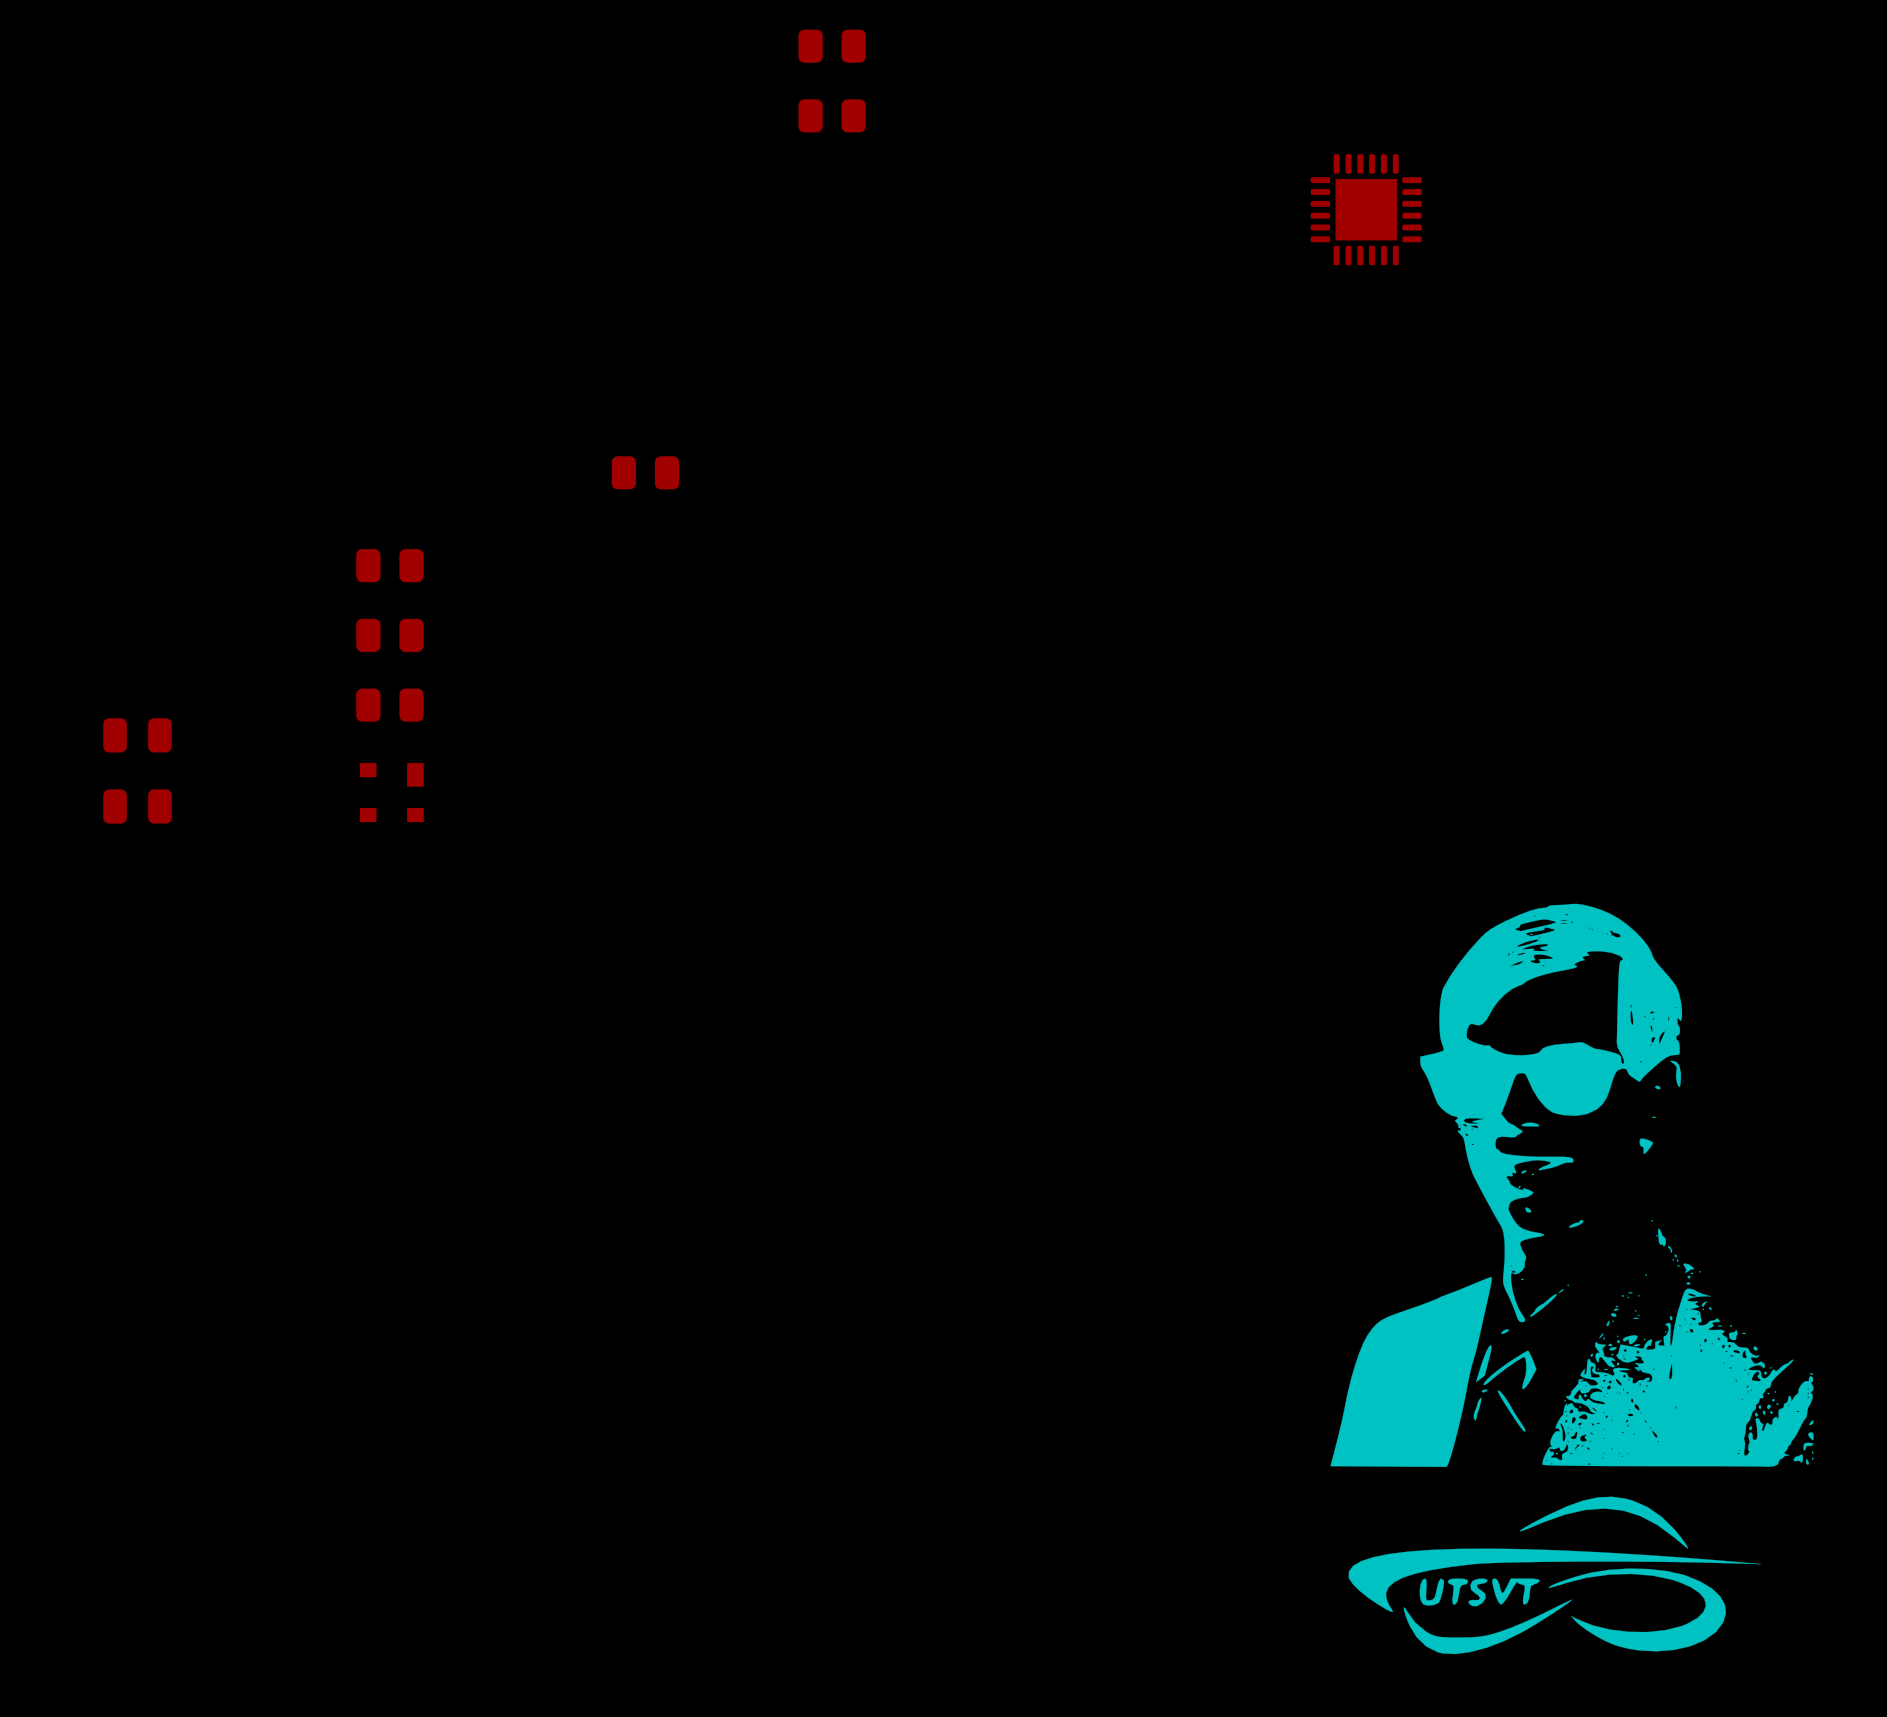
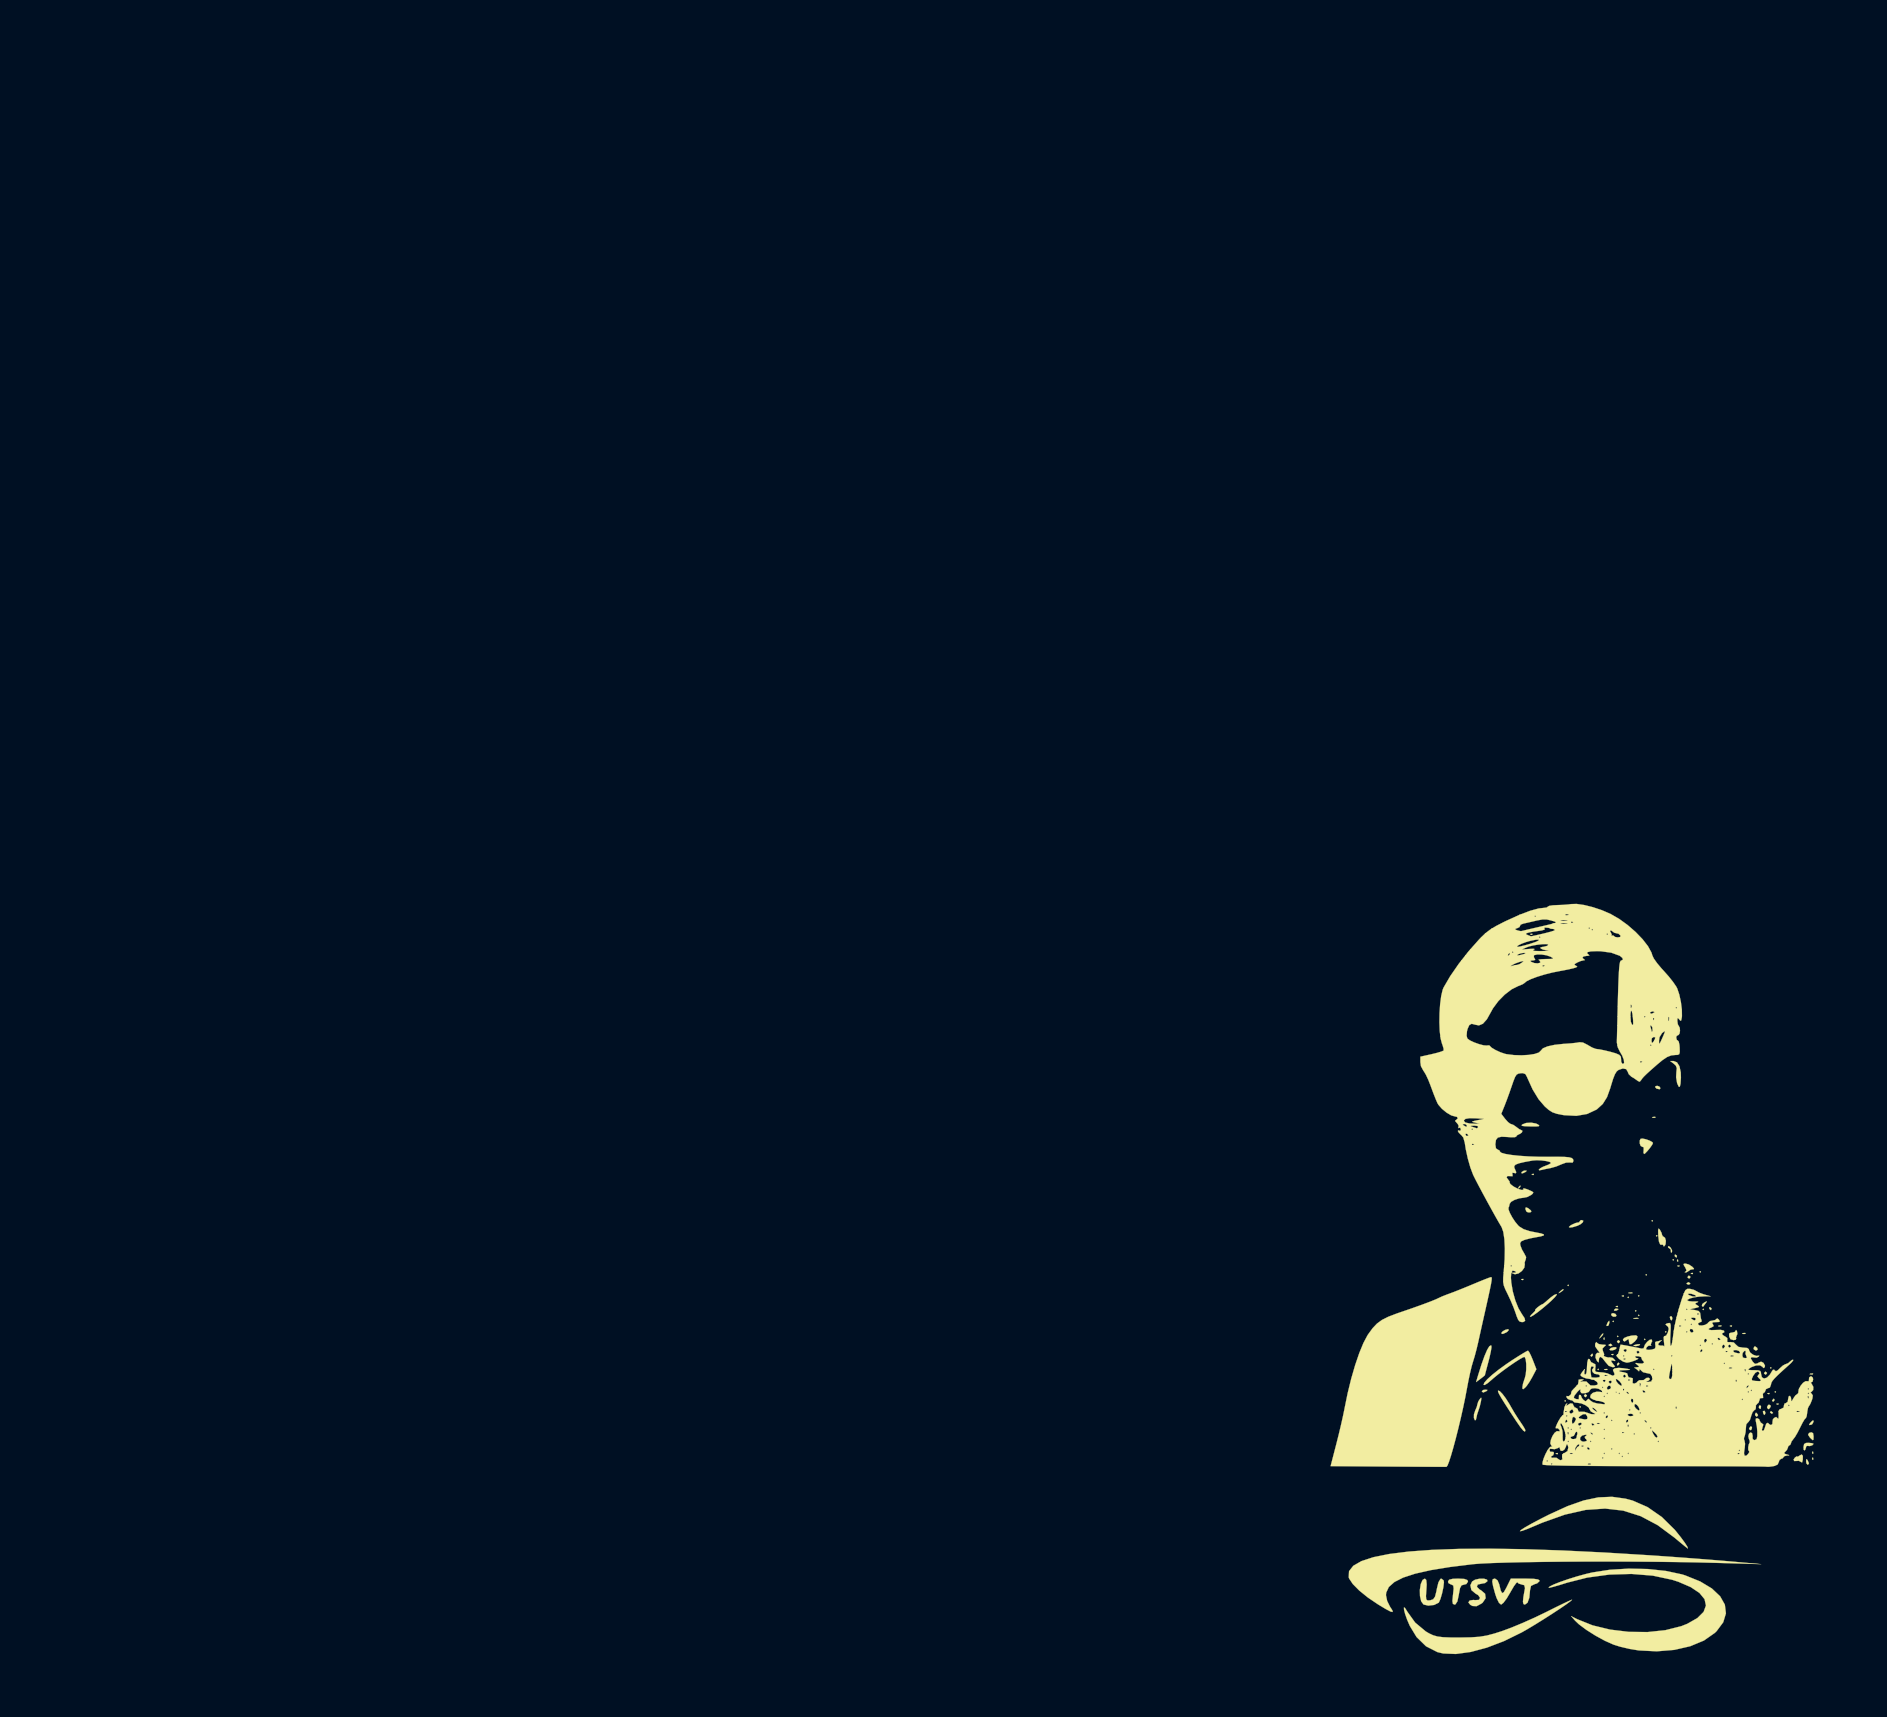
part: (832, 46) -> none
part: (832, 115) -> none
part: (1366, 209) -> none
part: (645, 472) -> none
part: (389, 565) -> none
part: (389, 635) -> none
part: (389, 705) -> none
part: (137, 735) -> none
part: (391, 792) -> none
part: (137, 806) -> none

